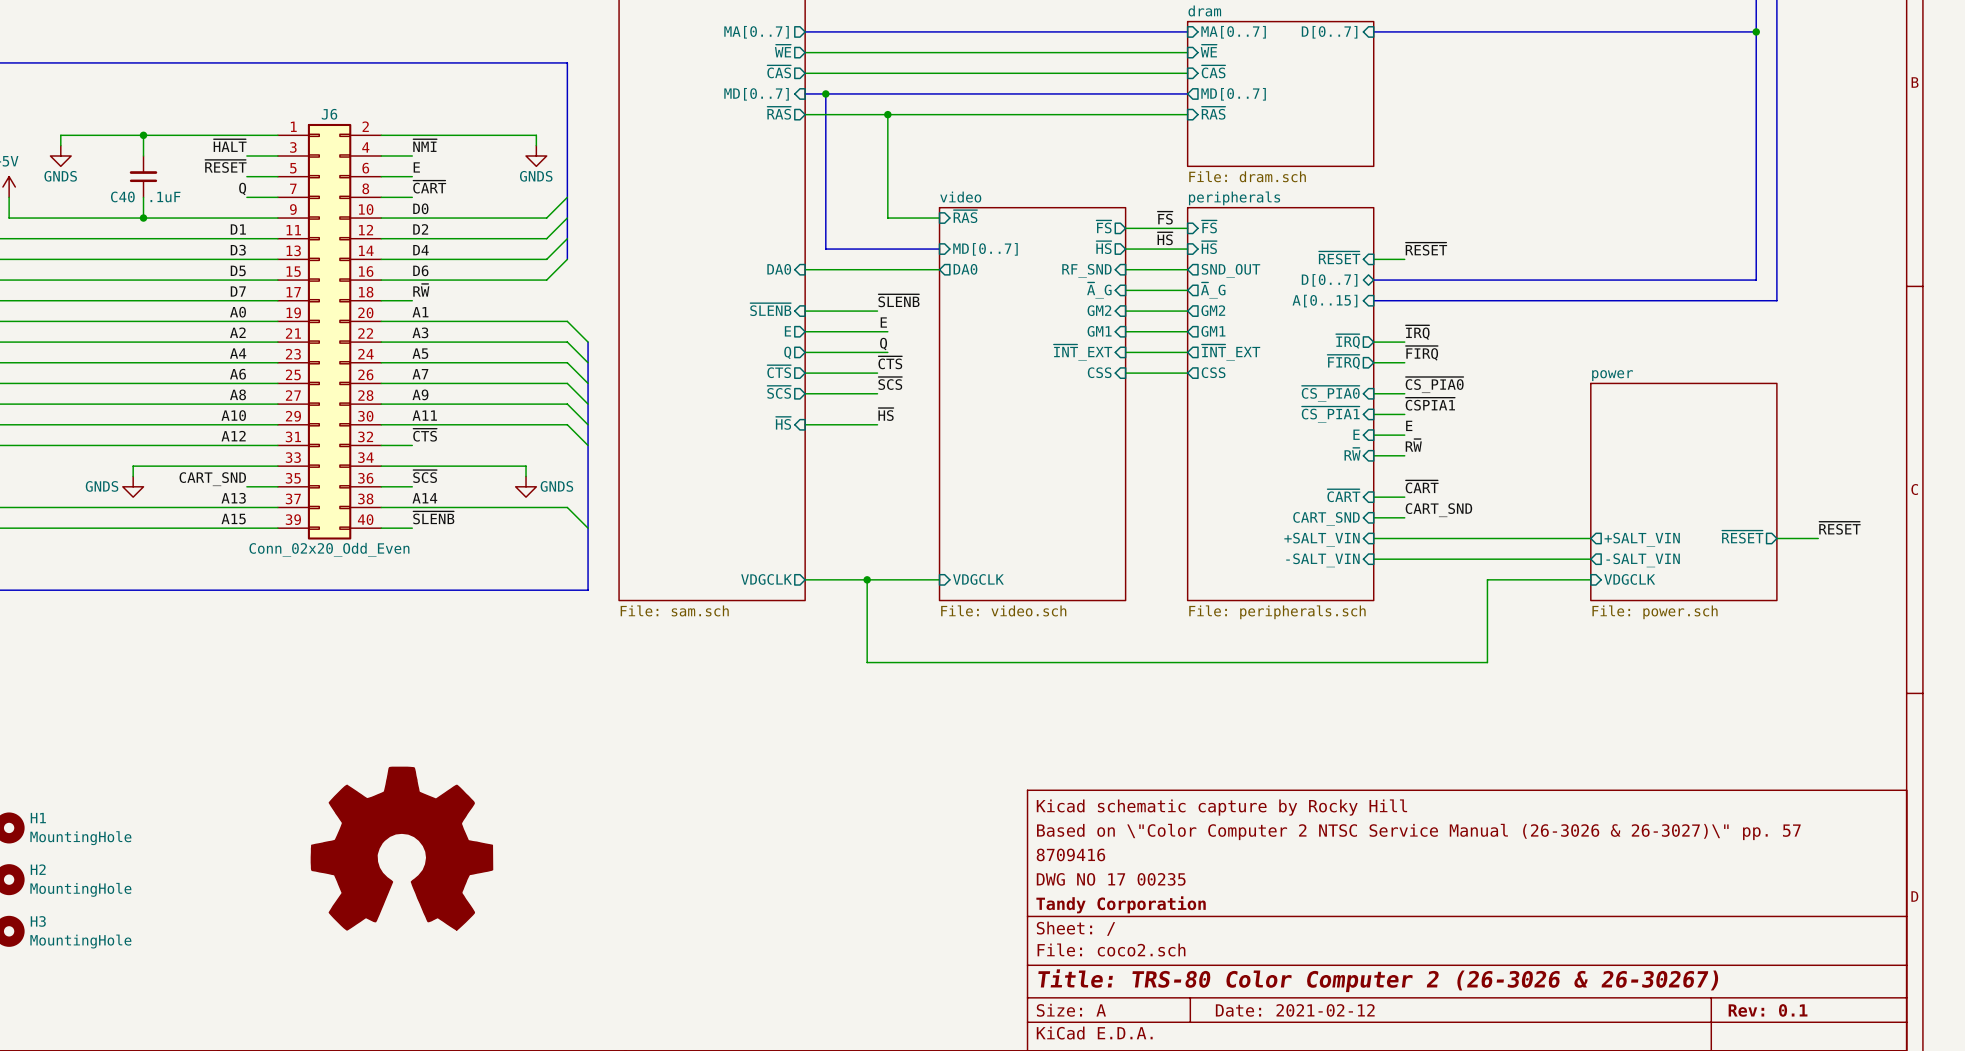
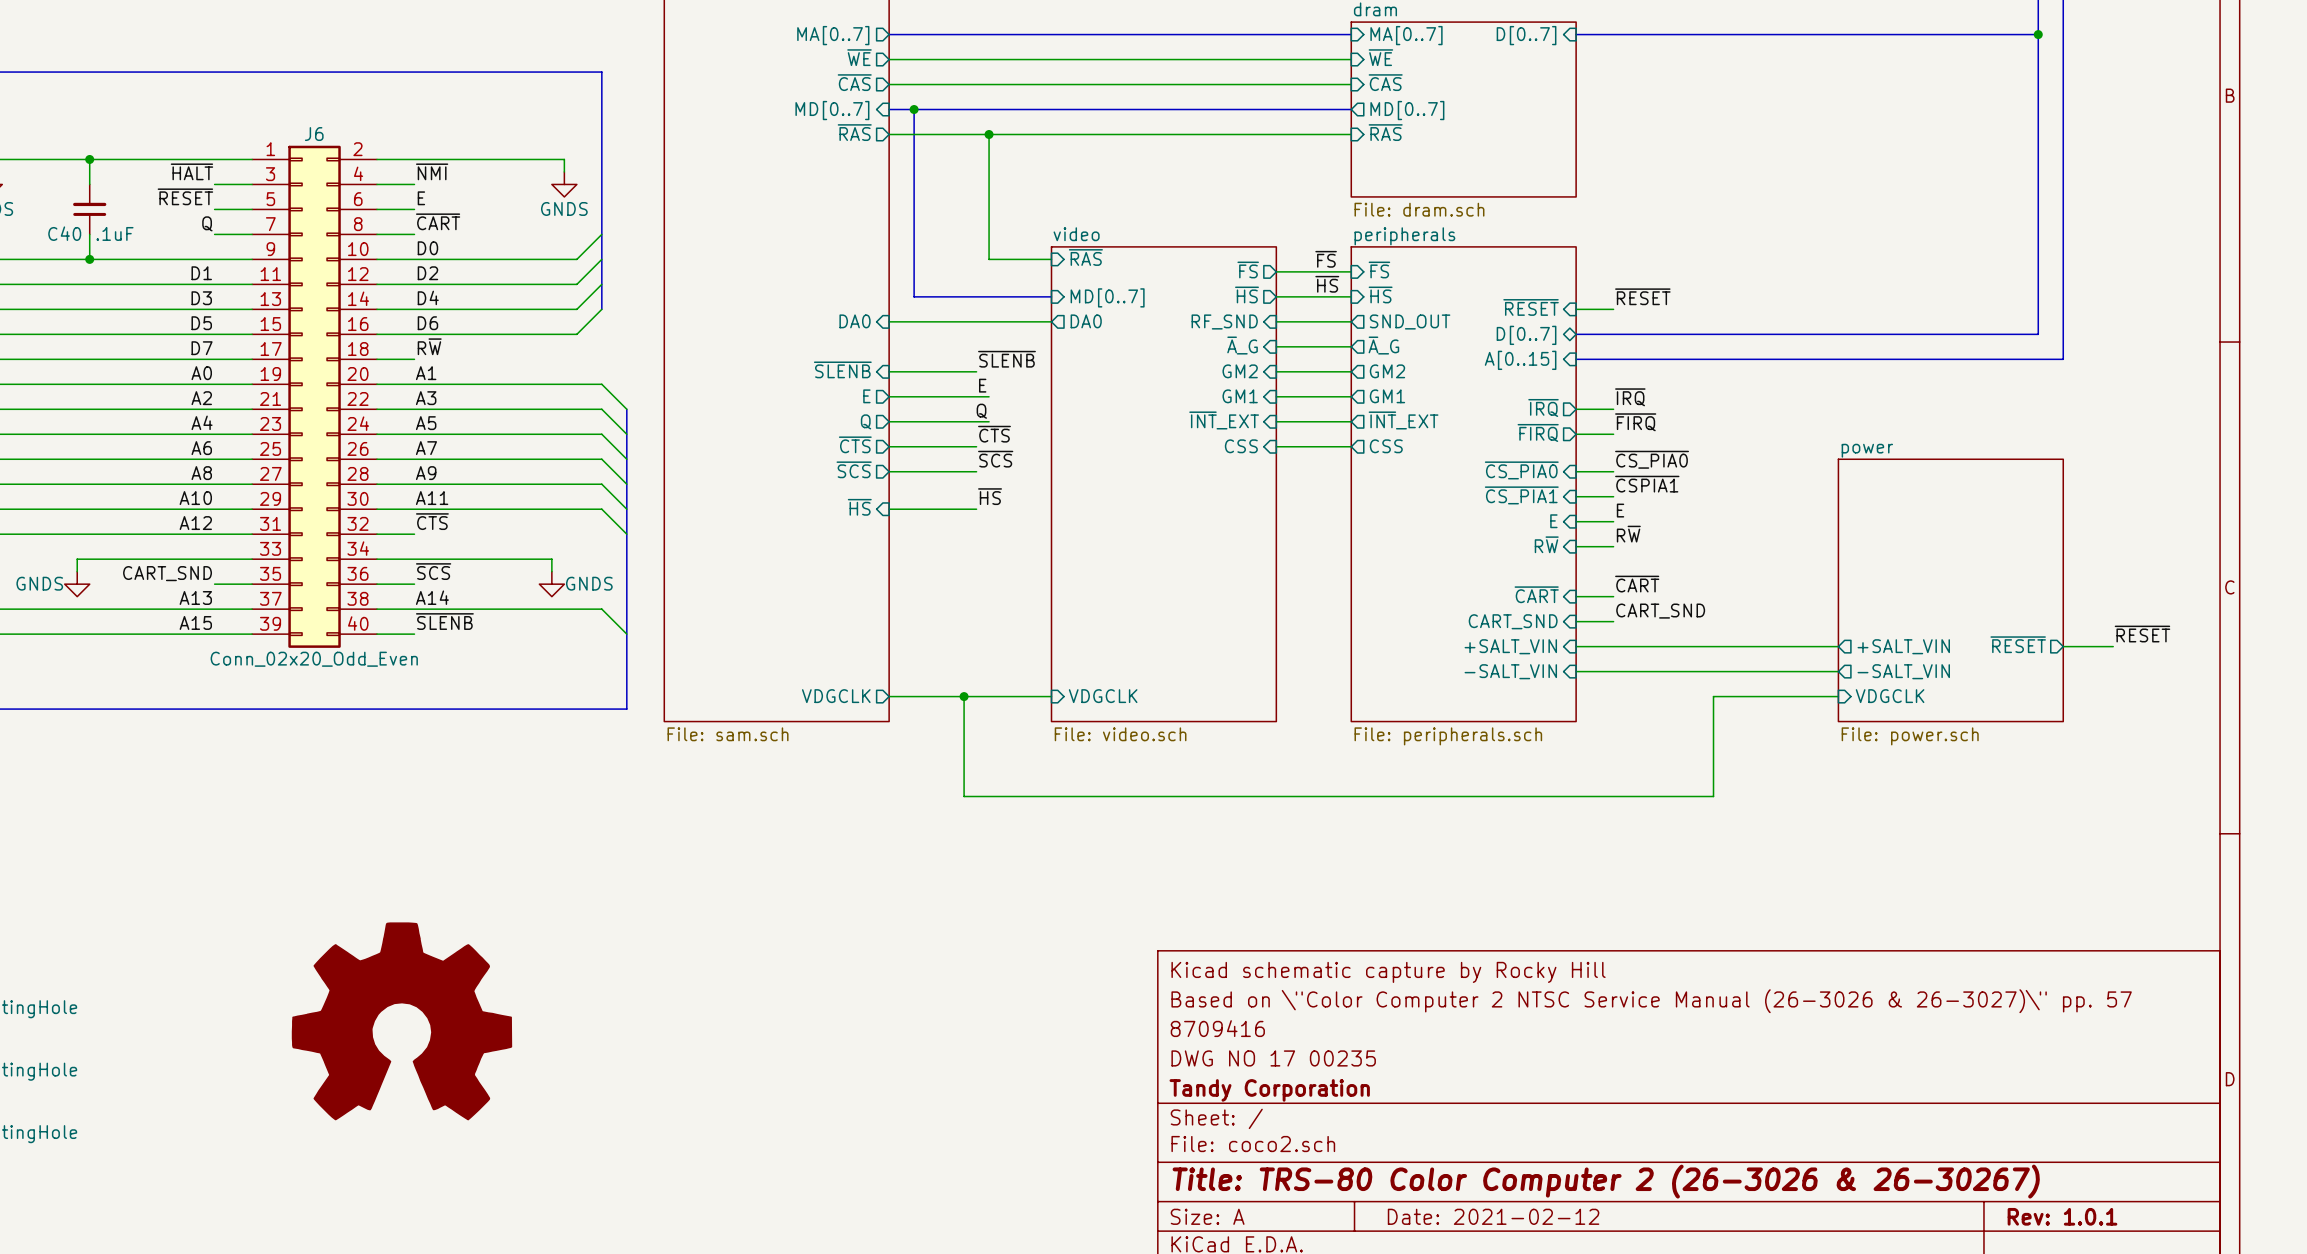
title block: Rev: 0.1 (1768, 1010) -> Rev: 1.0.1 (2062, 1216)

